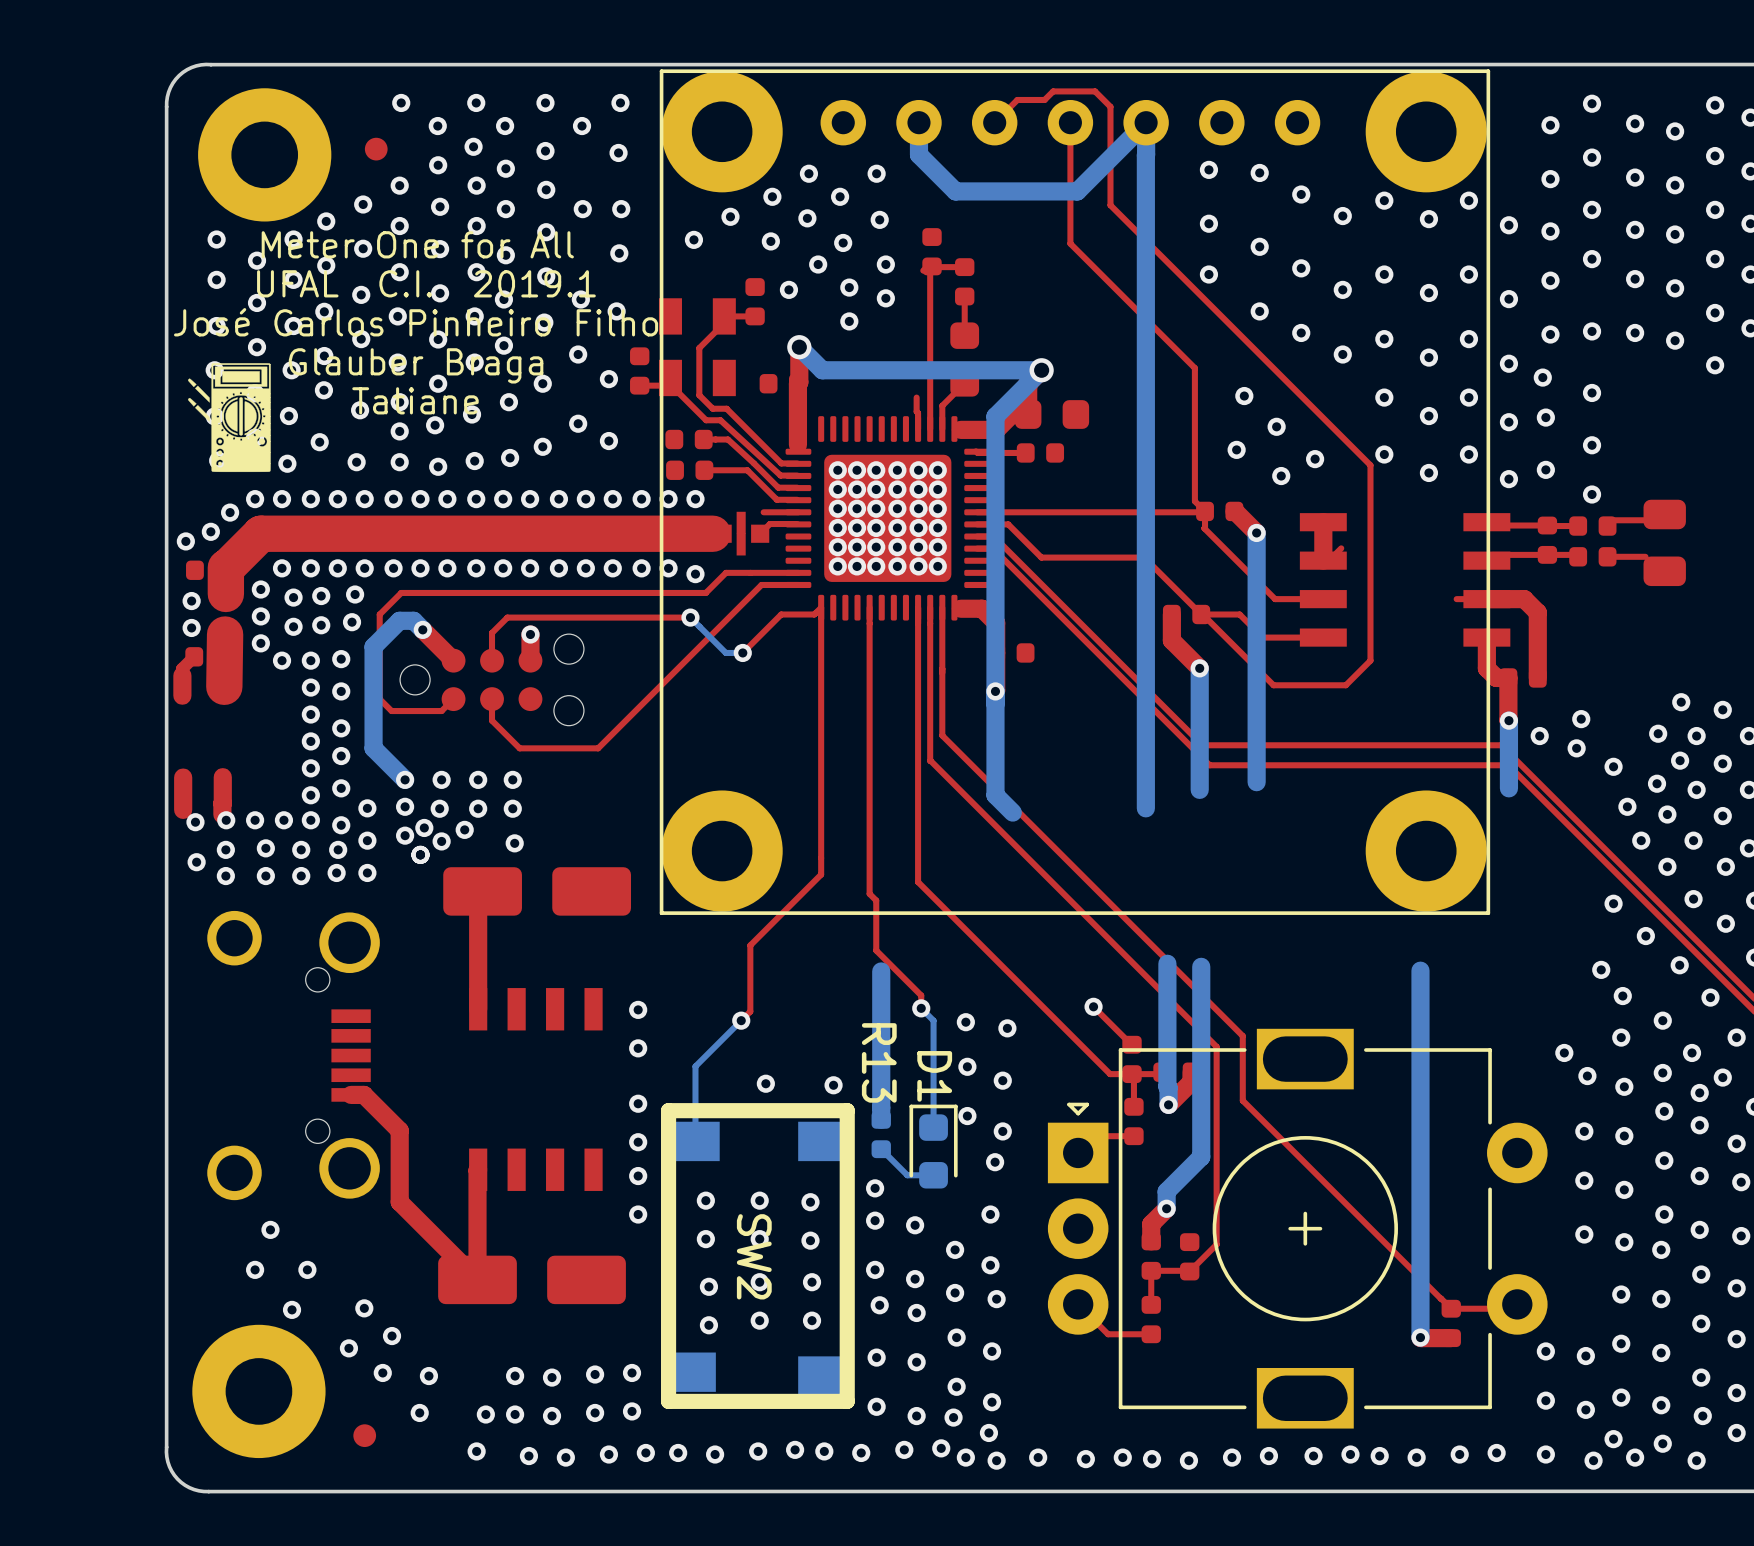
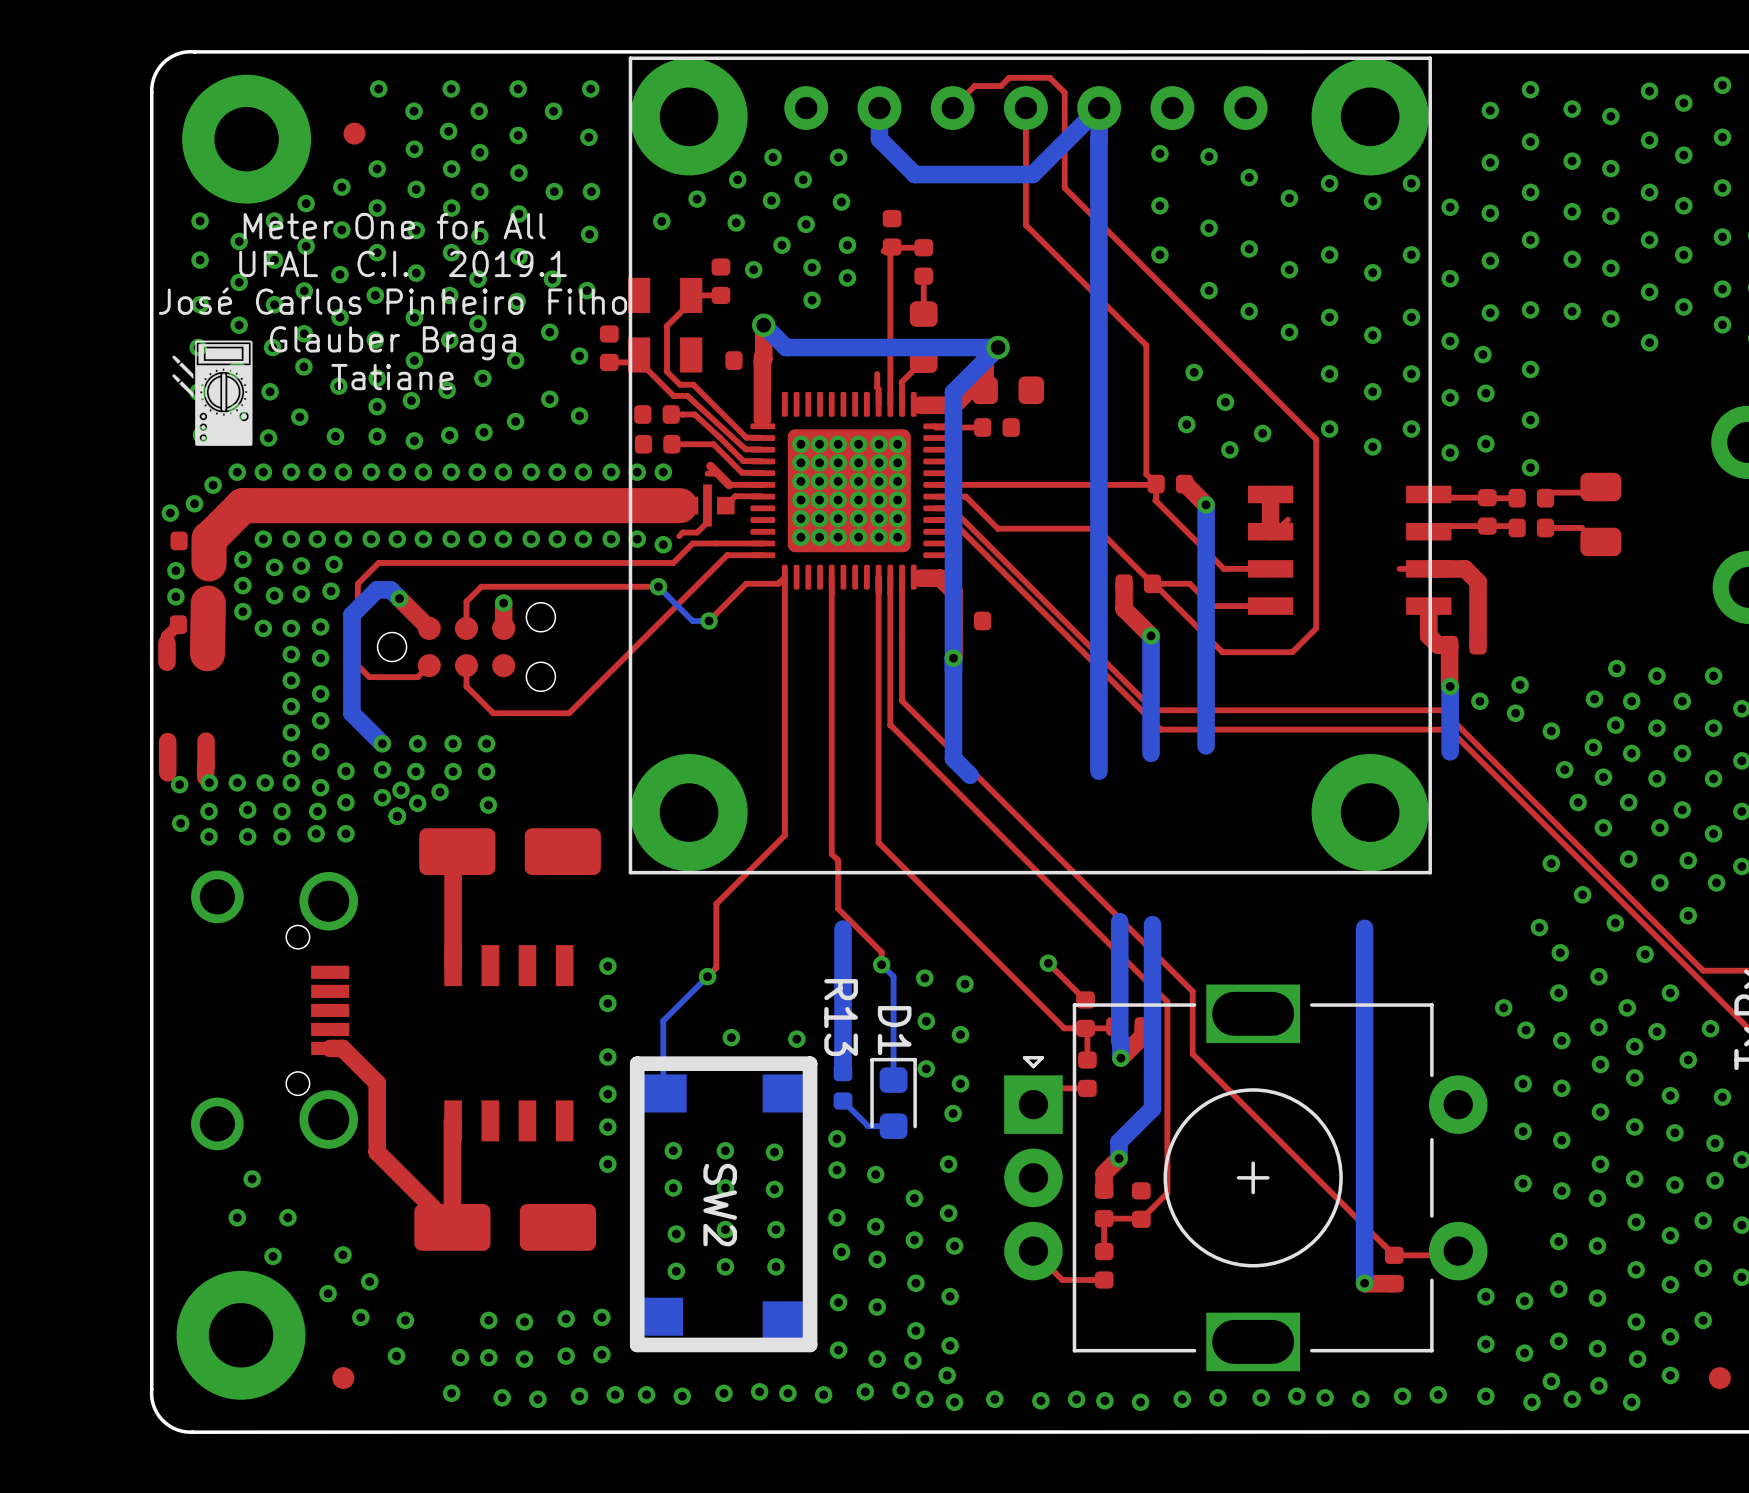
top track: none -> (710, 466) (729, 484)
top track: none -> (717, 473) (707, 473)
top track: none -> (707, 516) (707, 522) (697, 532) (682, 532) (679, 536)

